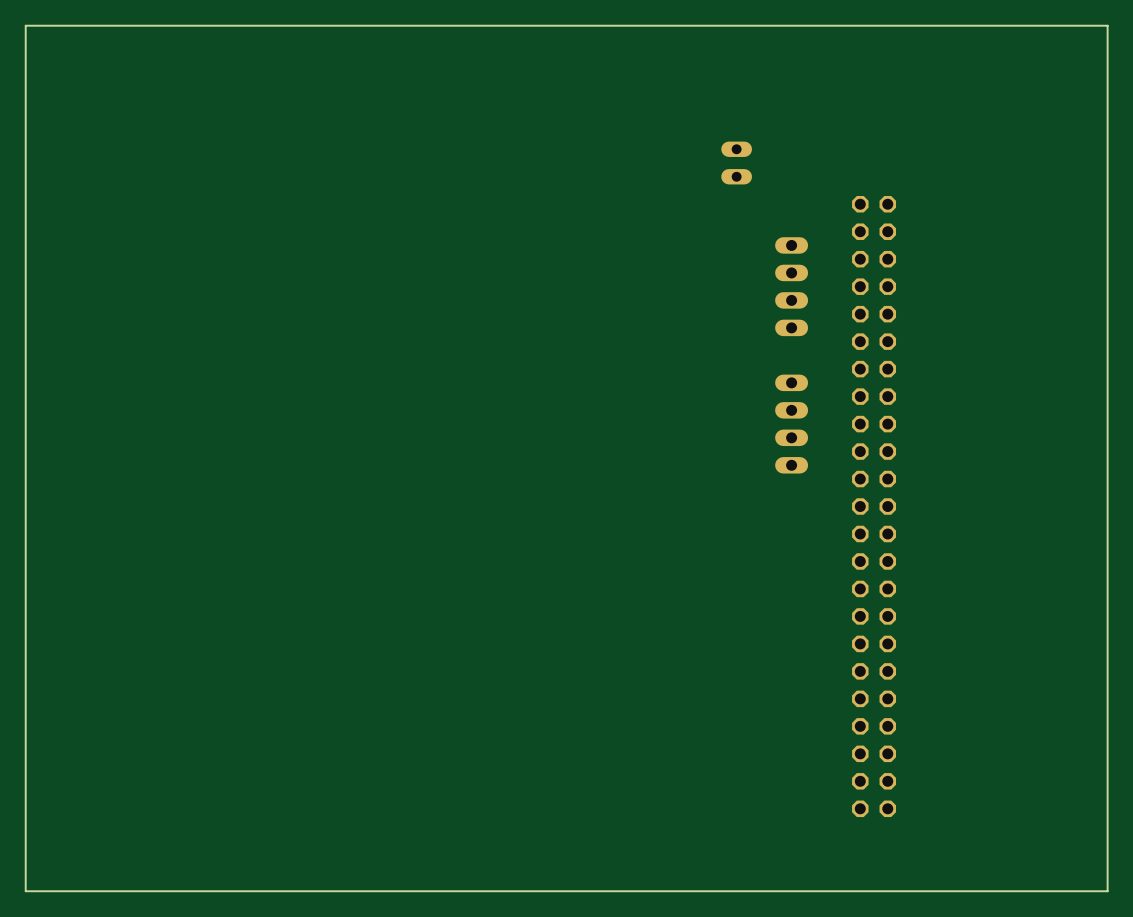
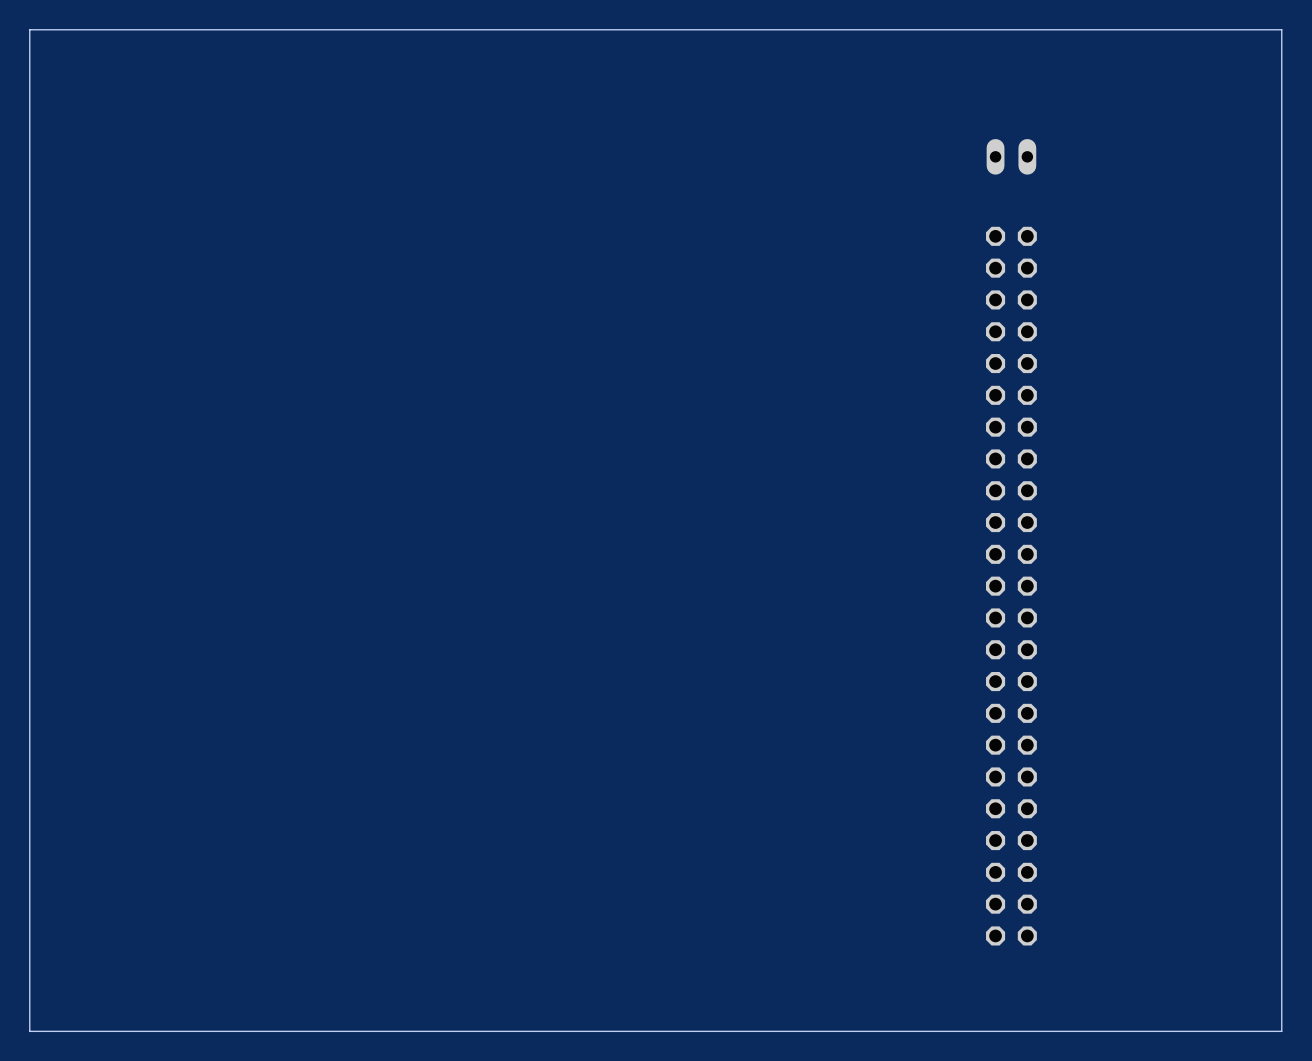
part rotation: 0° (736, 163) -> 90° clockwise (1011, 156)
part position: (736, 163) -> (1011, 156)
part: (791, 286) -> none
part: (791, 424) -> none

